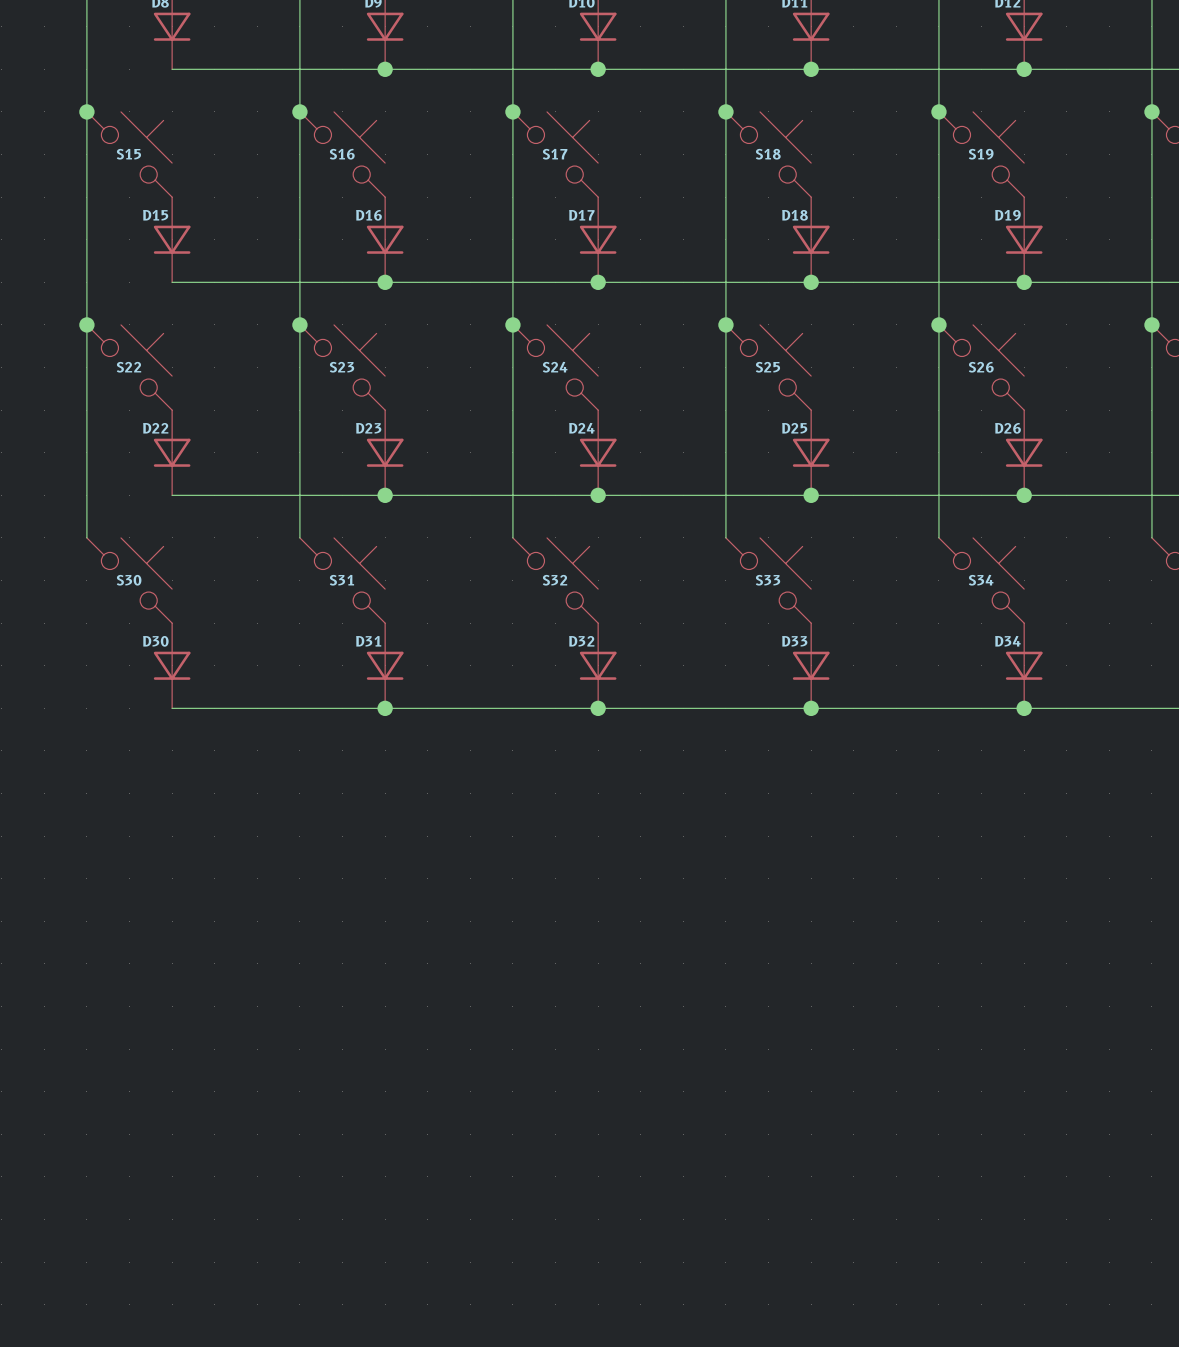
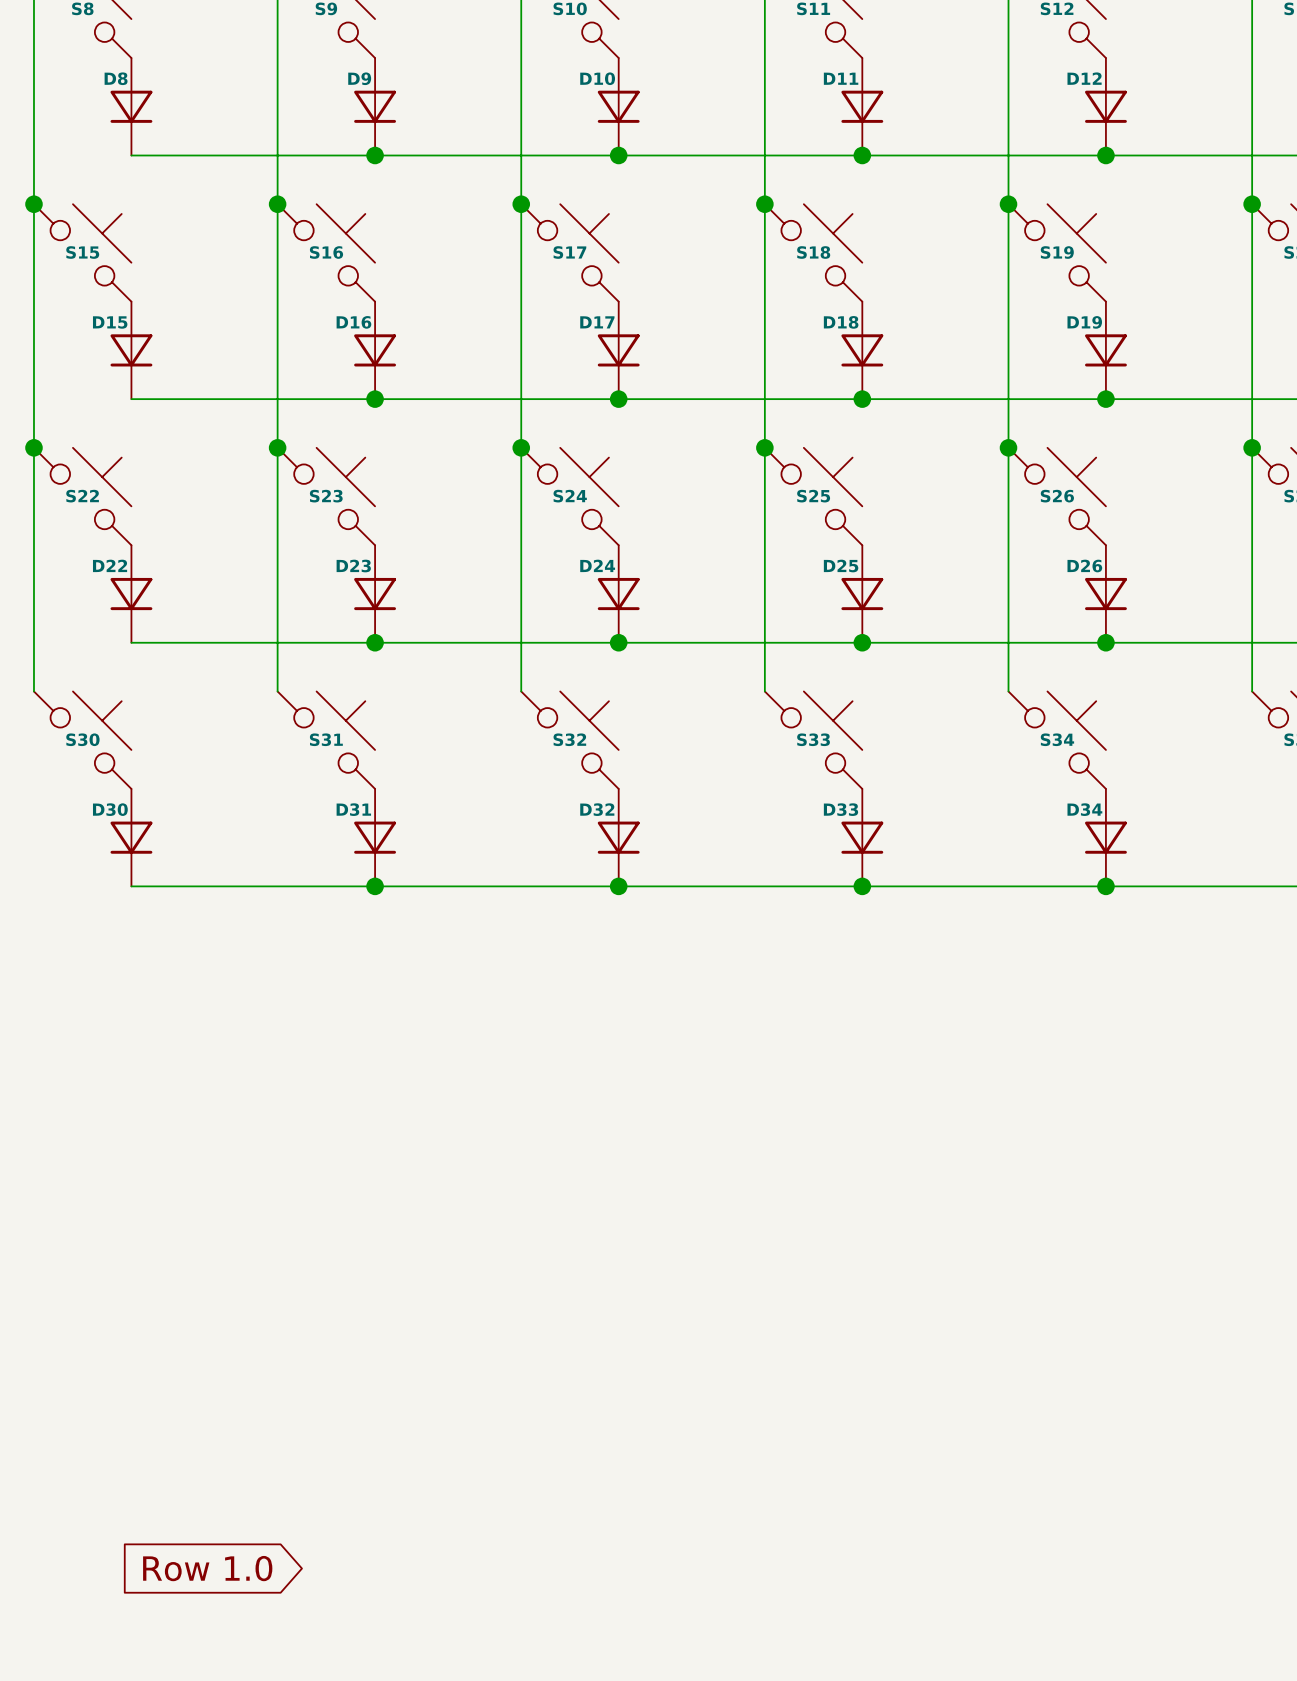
global label: none -> Row 1.0 (207, 1568)

